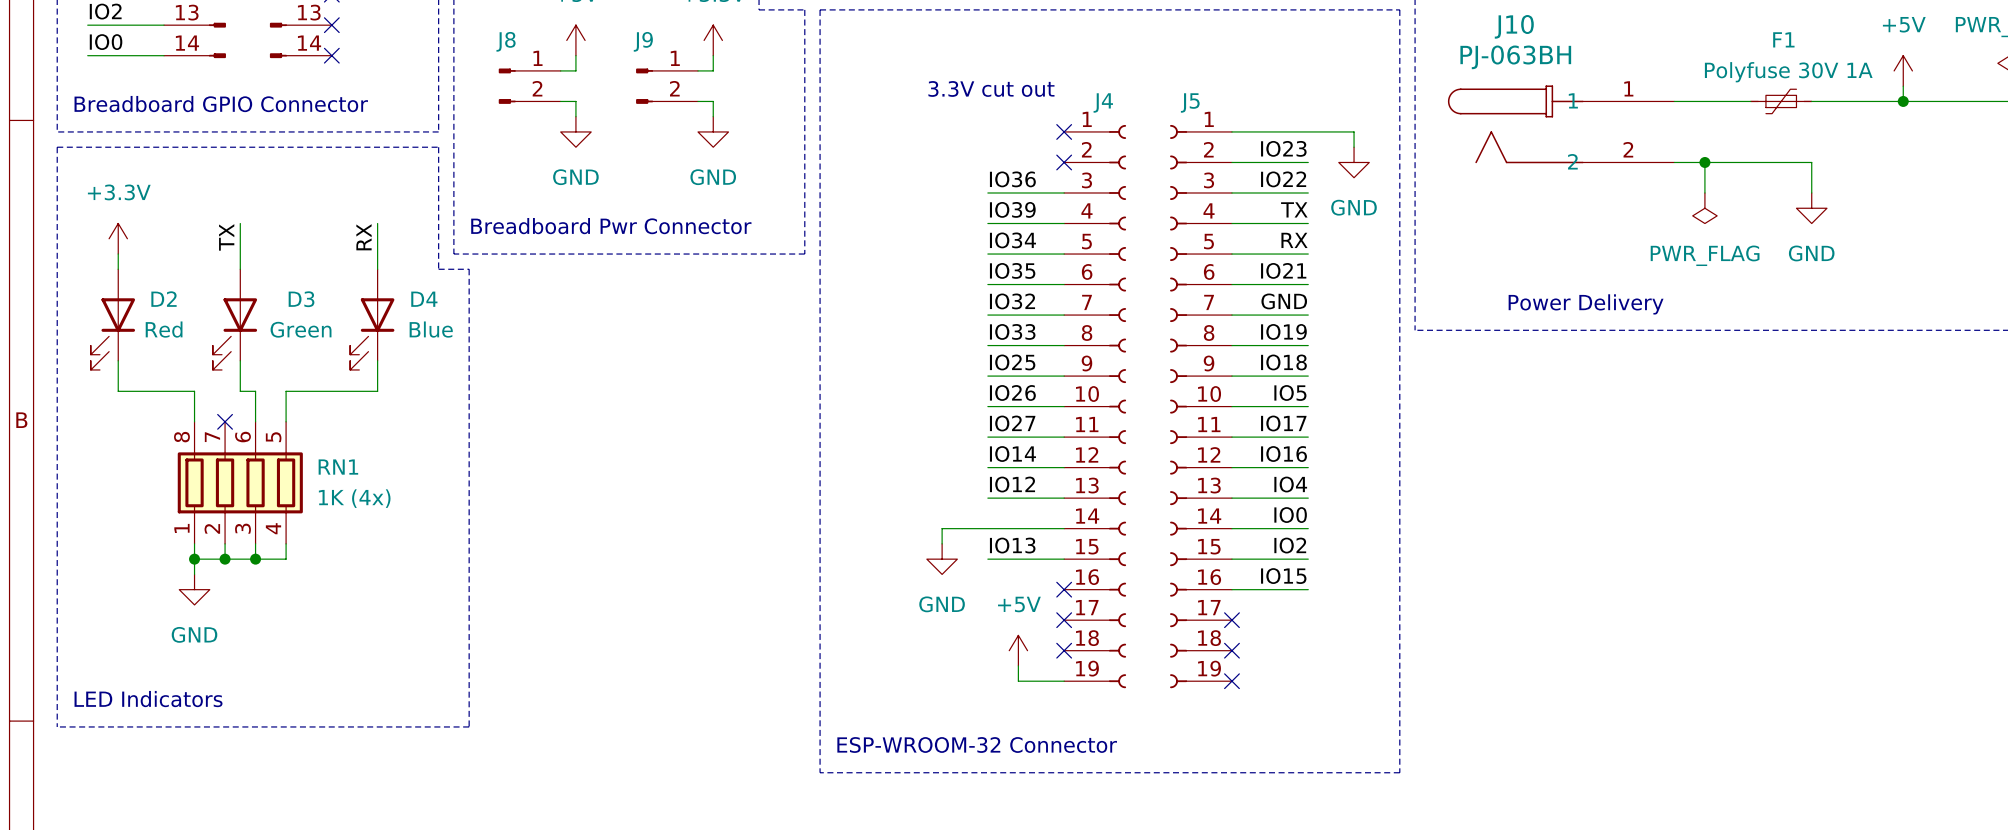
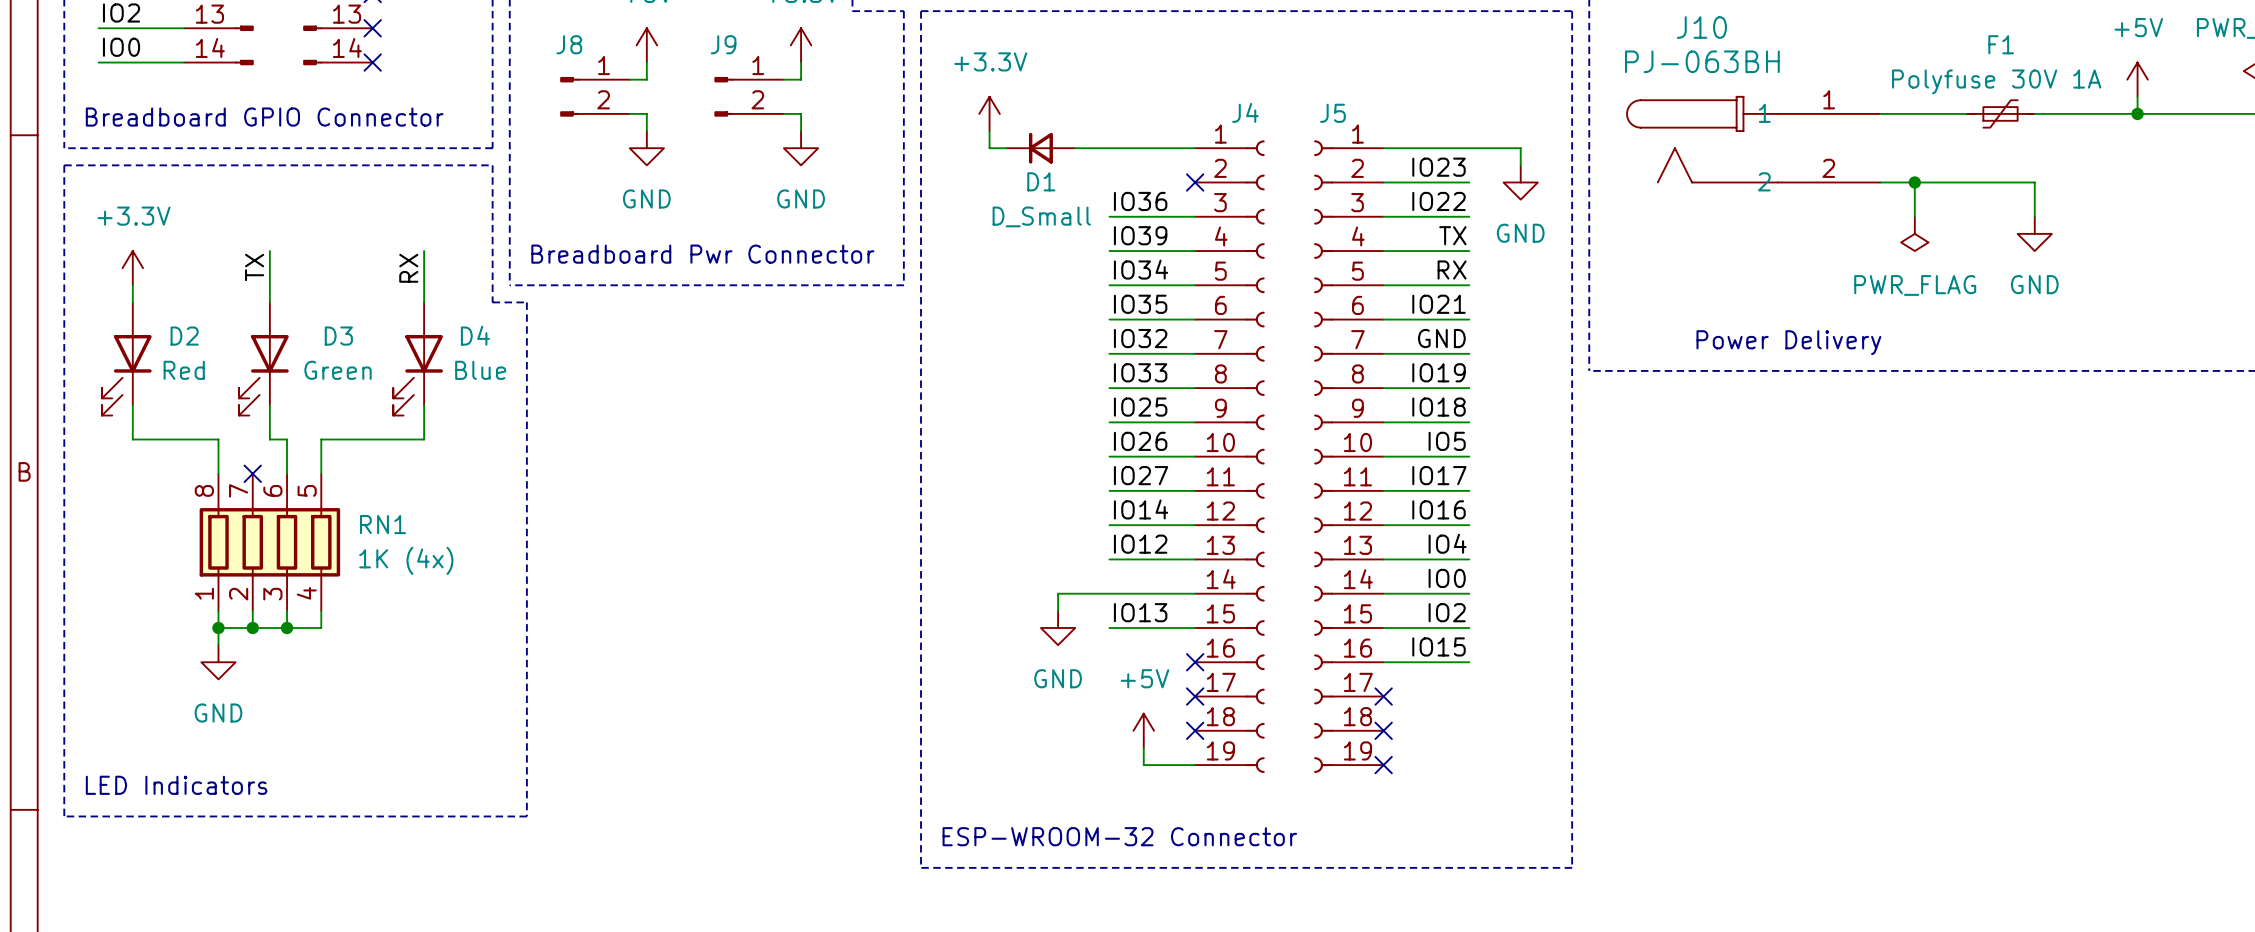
text: 3.3V cut out (991, 88) -> none
power symbol: none -> +3.3V (989, 113)
wire: none -> (989, 131) (989, 148) (1006, 148)
D1: none -> D_Small (1040, 148)
wire: none -> (1075, 148) (1195, 148)
no-connect mark: (1064, 131) -> none

